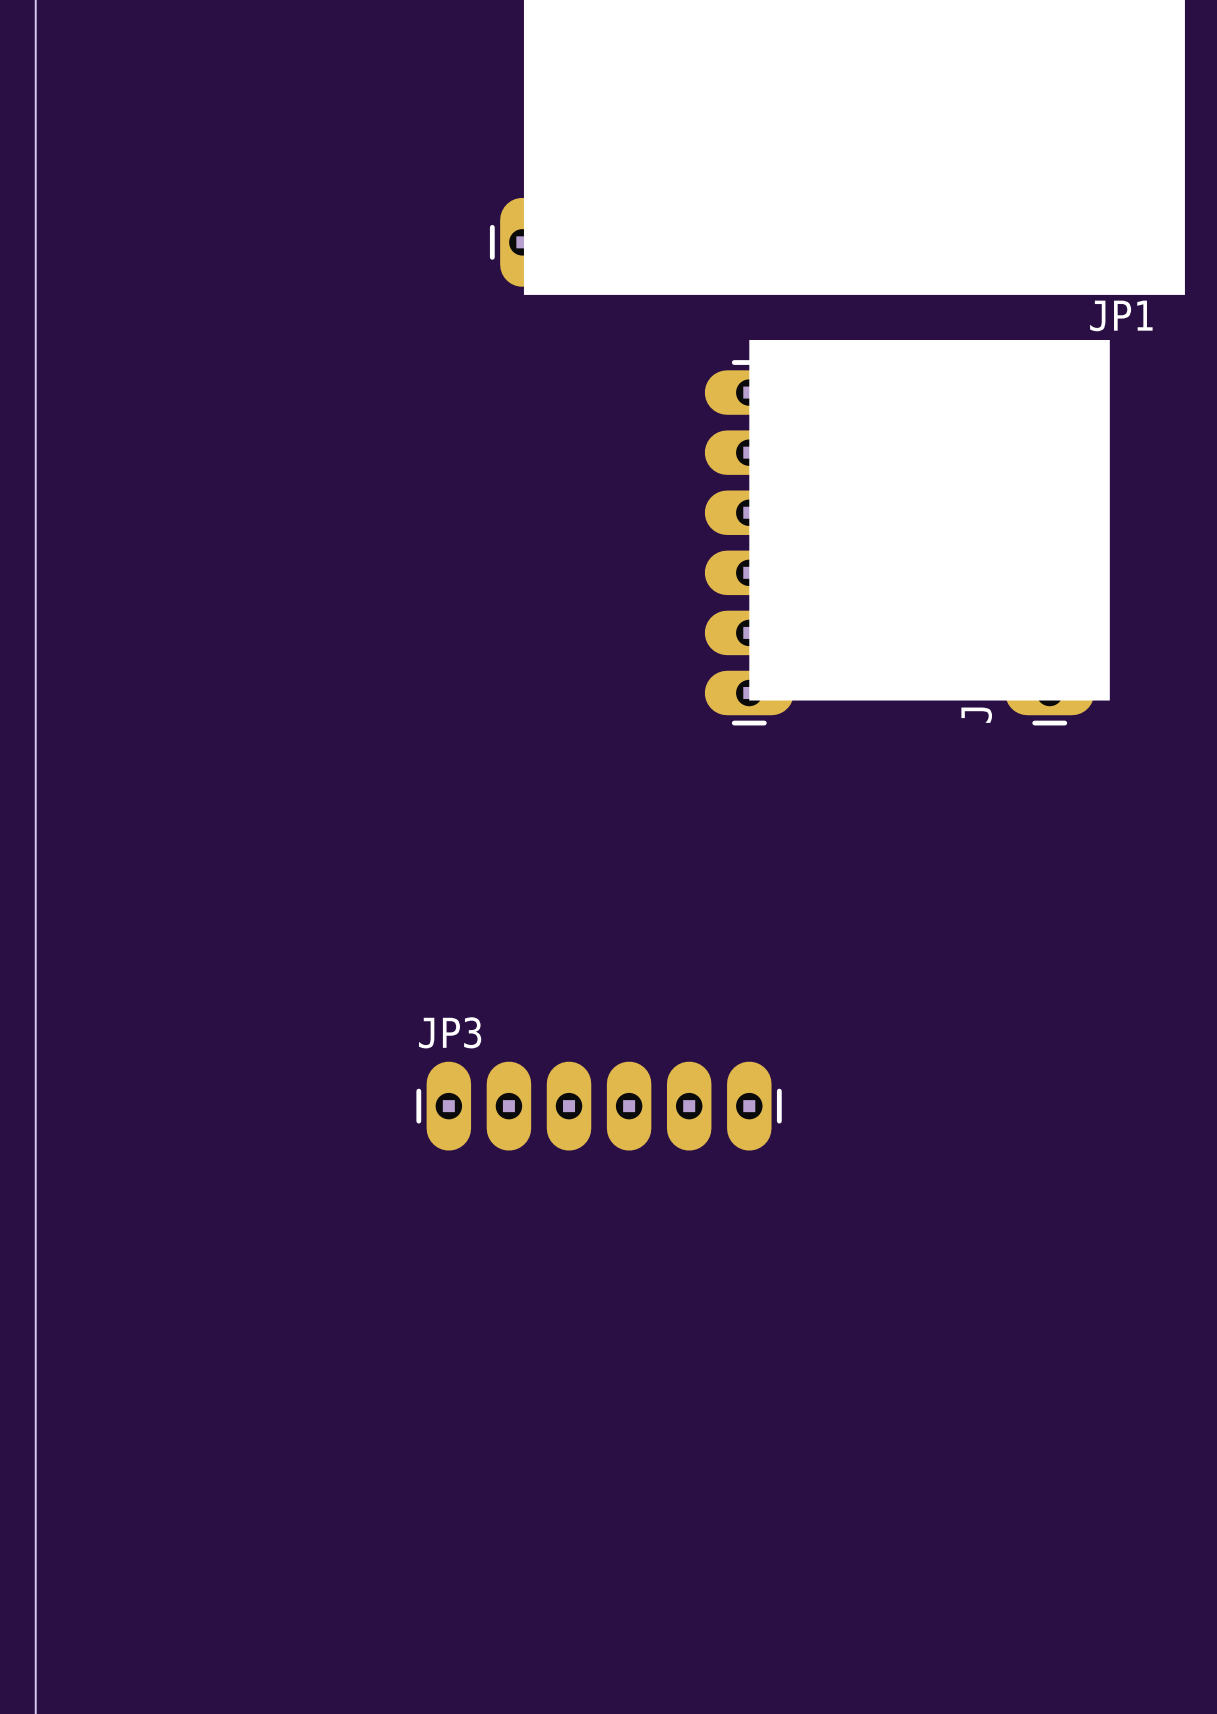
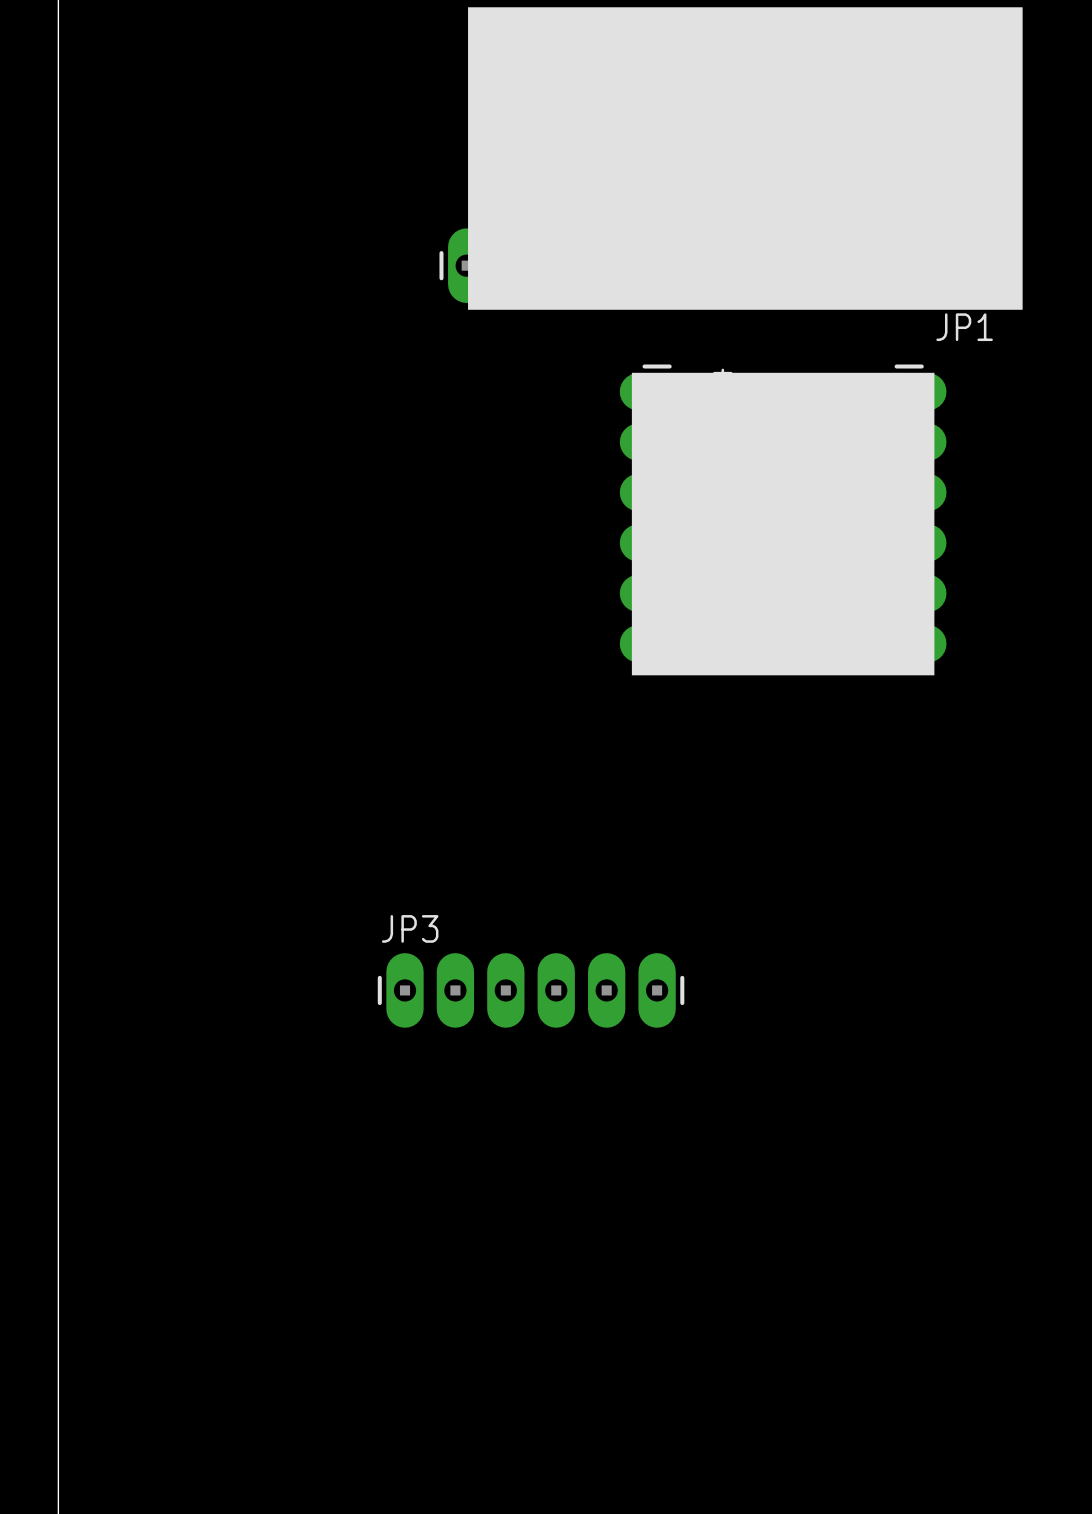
drawing position: (929, 520) -> (783, 524)

